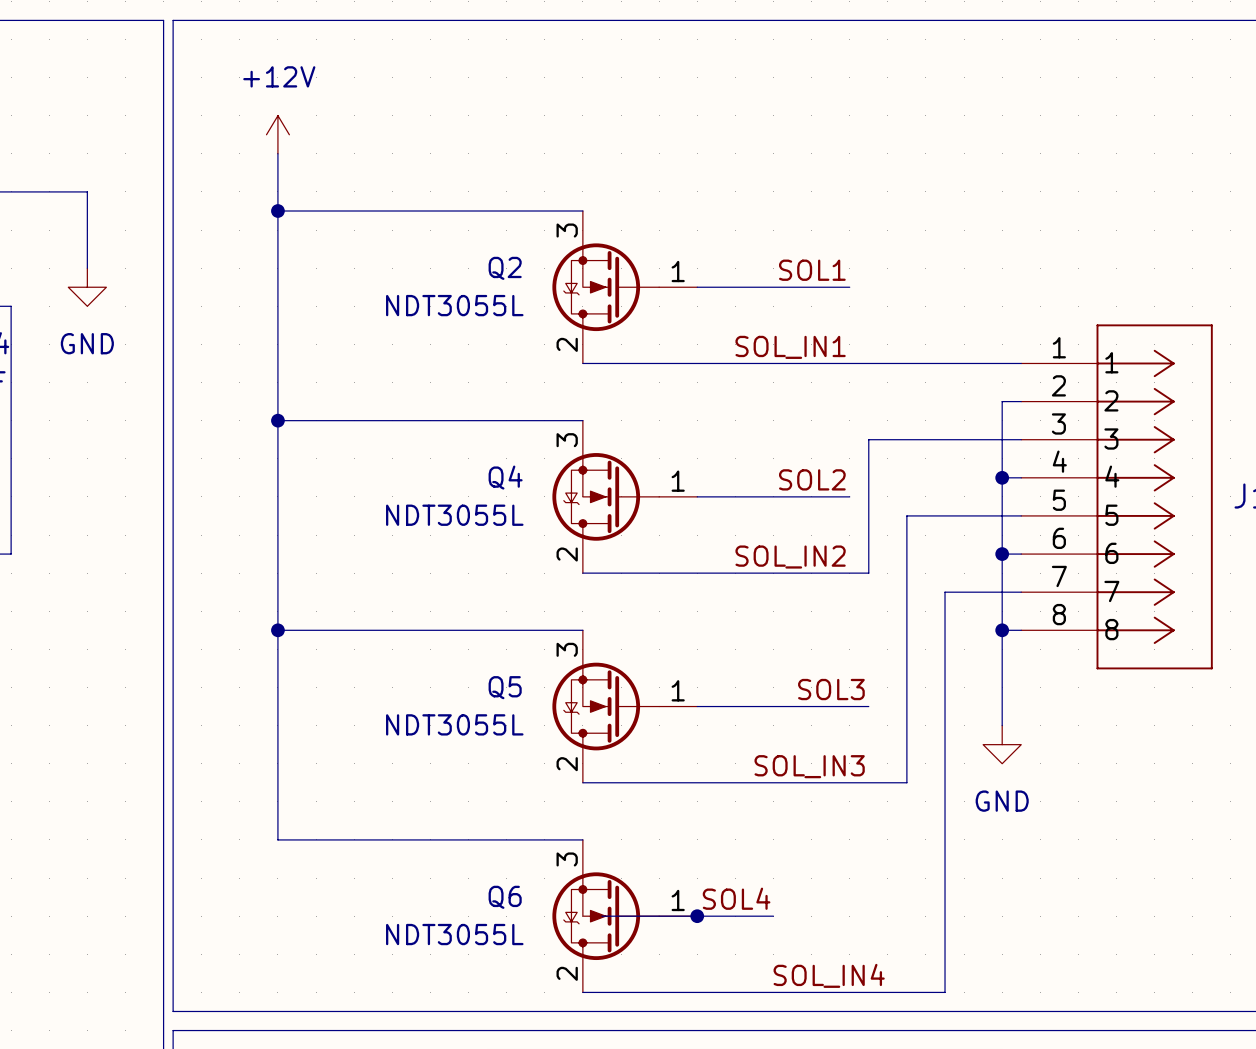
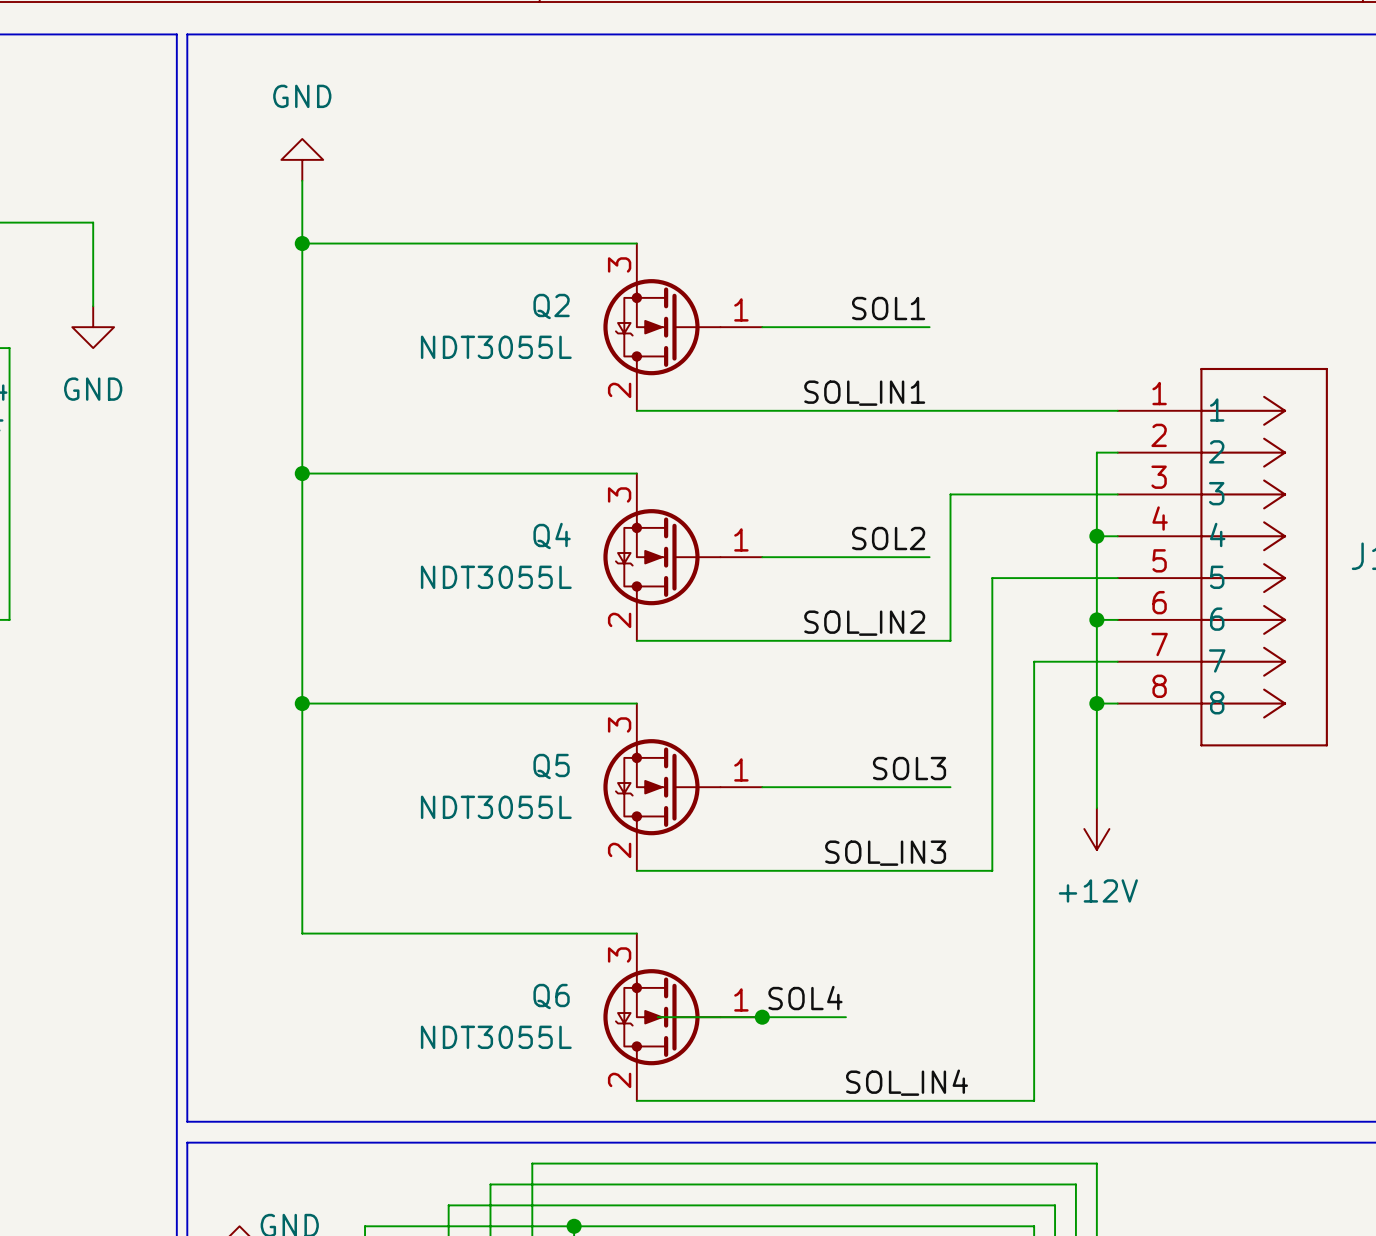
power symbol: +12V (277, 134) -> GND (302, 159)
power symbol: GND (1002, 744) -> +12V (1096, 829)

